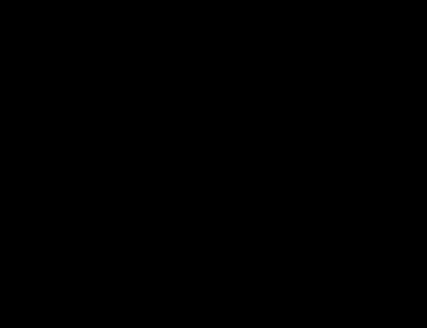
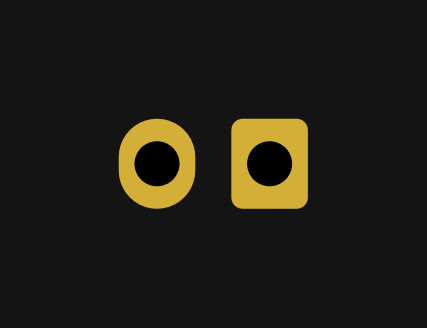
part: none -> (213, 163)

